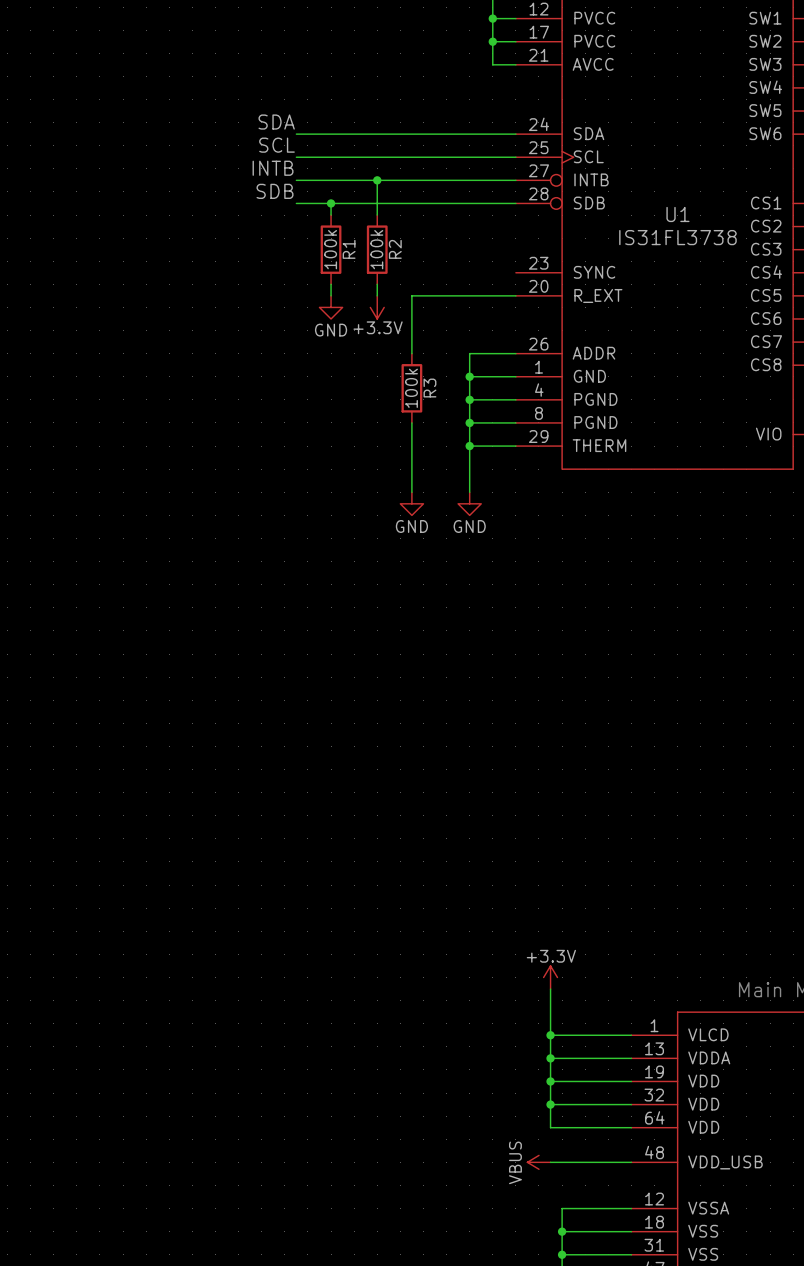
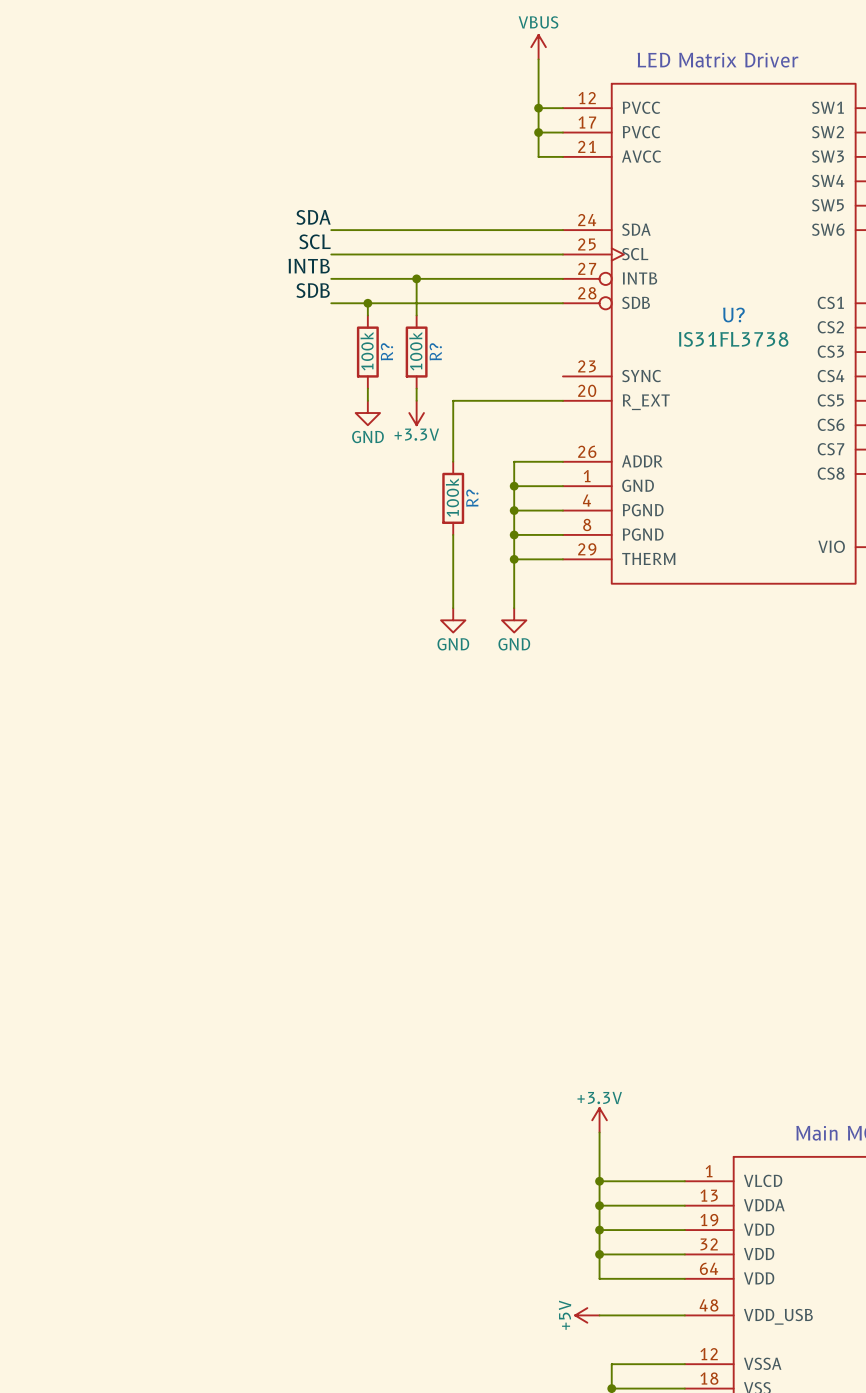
U1 name: U1 (677, 214) -> U? (733, 314)
R1 name: R1 (349, 249) -> R? (386, 351)
R2 name: R2 (395, 249) -> R? (435, 351)
R3 name: R3 (429, 388) -> R? (472, 498)
power symbol: VBUS (538, 1162) -> +5V (587, 1315)

